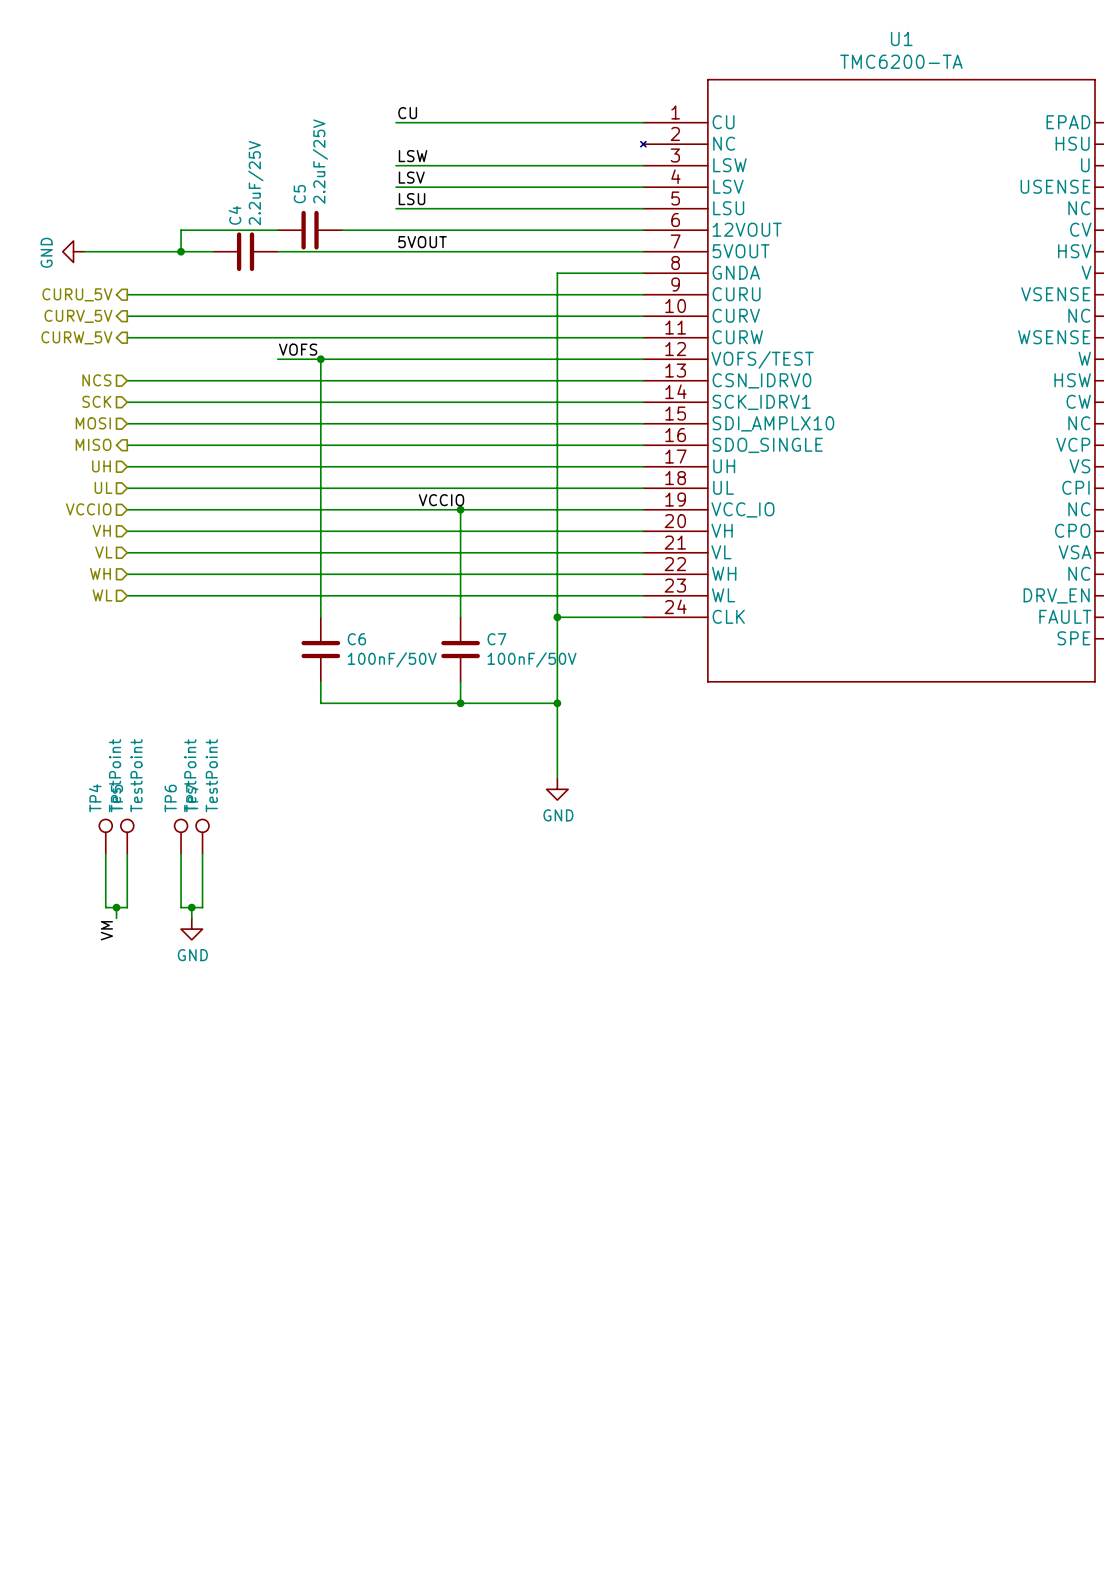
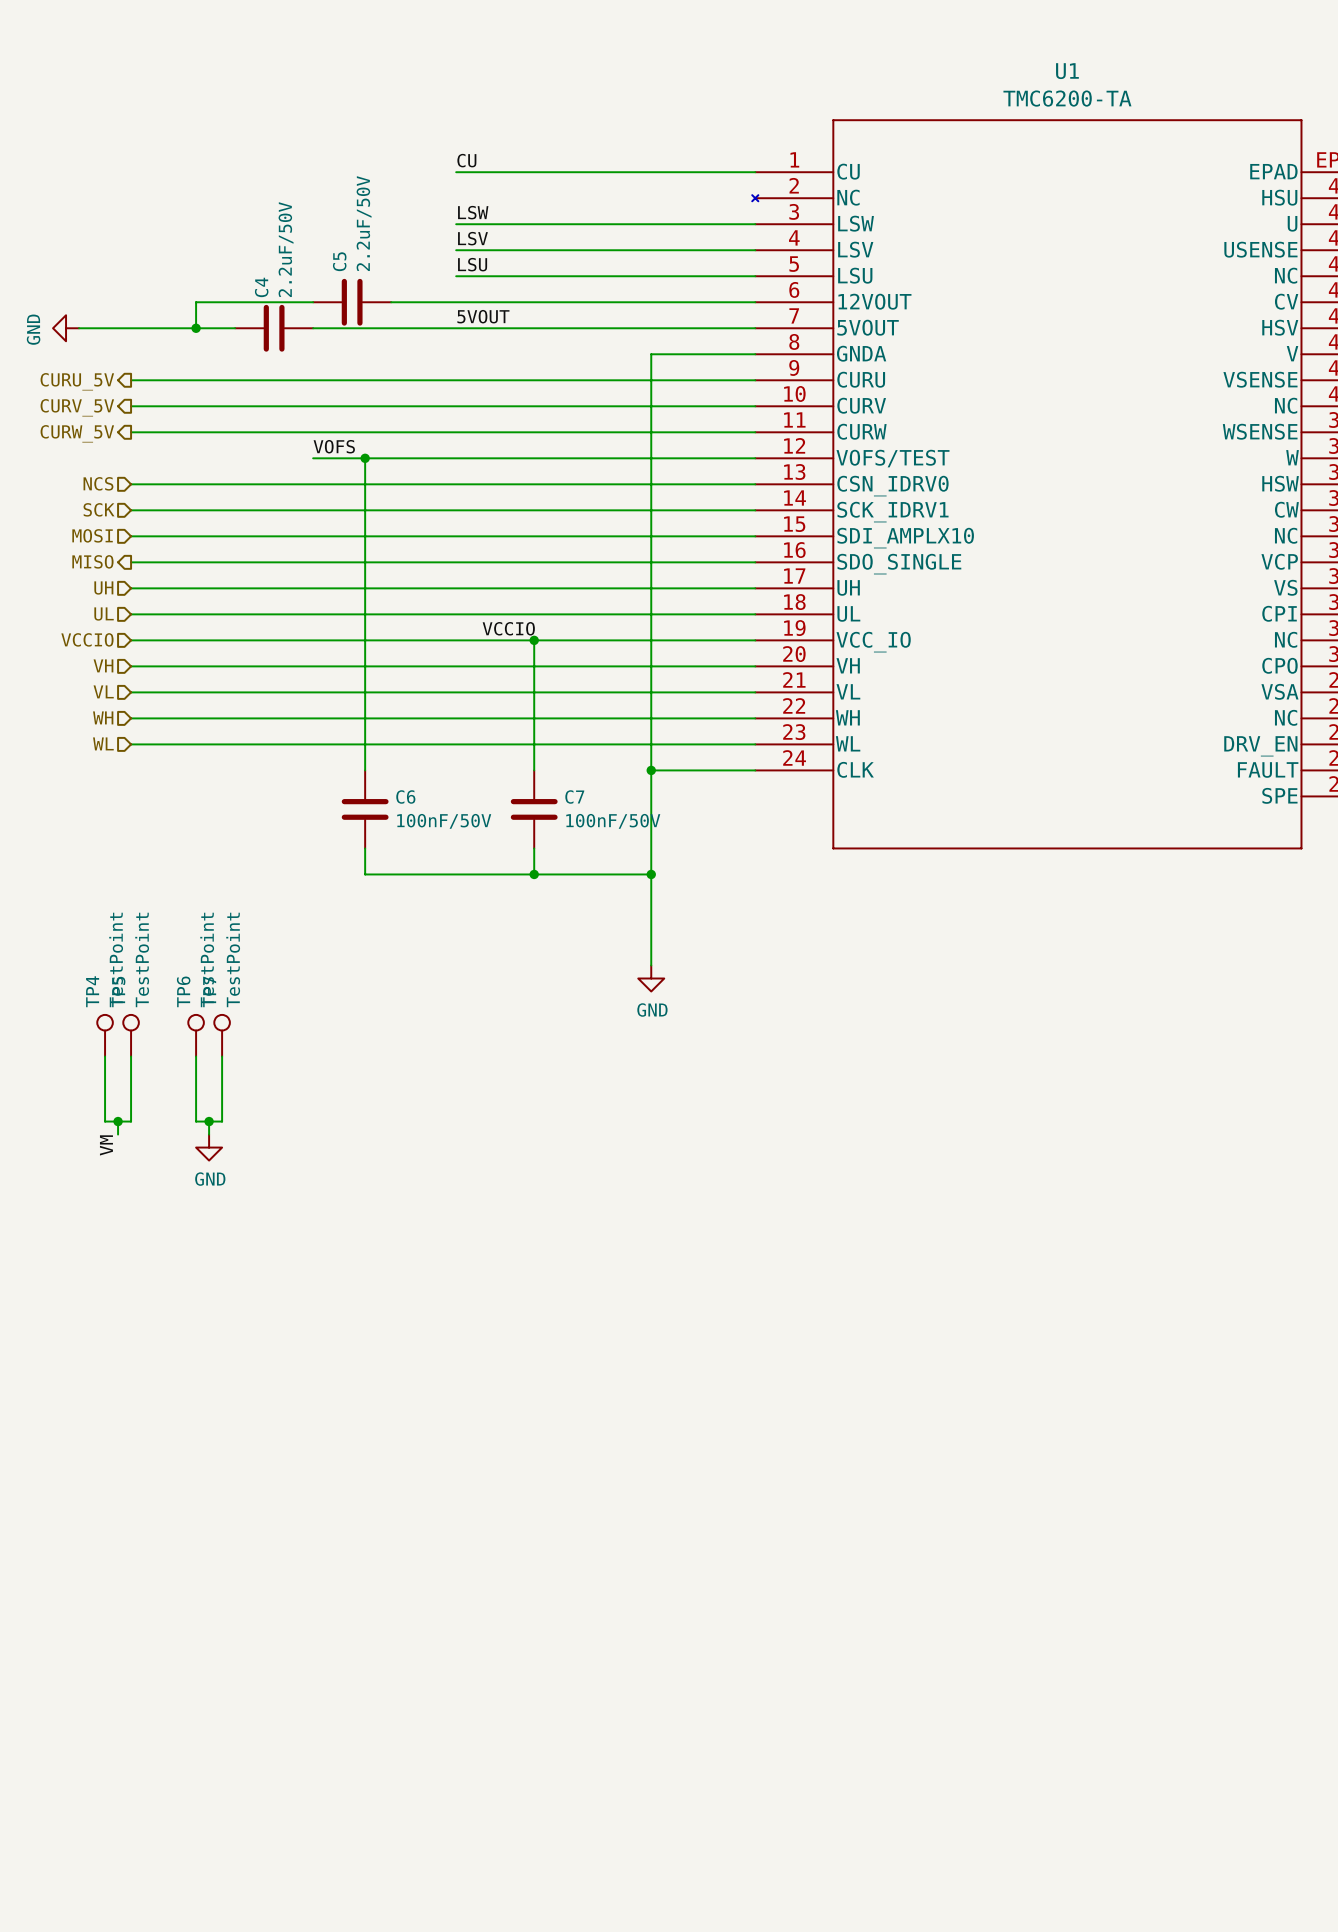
C5 value: 2.2uF/25V (320, 161) -> 2.2uF/50V (364, 223)
C4 value: 2.2uF/25V (255, 183) -> 2.2uF/50V (286, 249)

